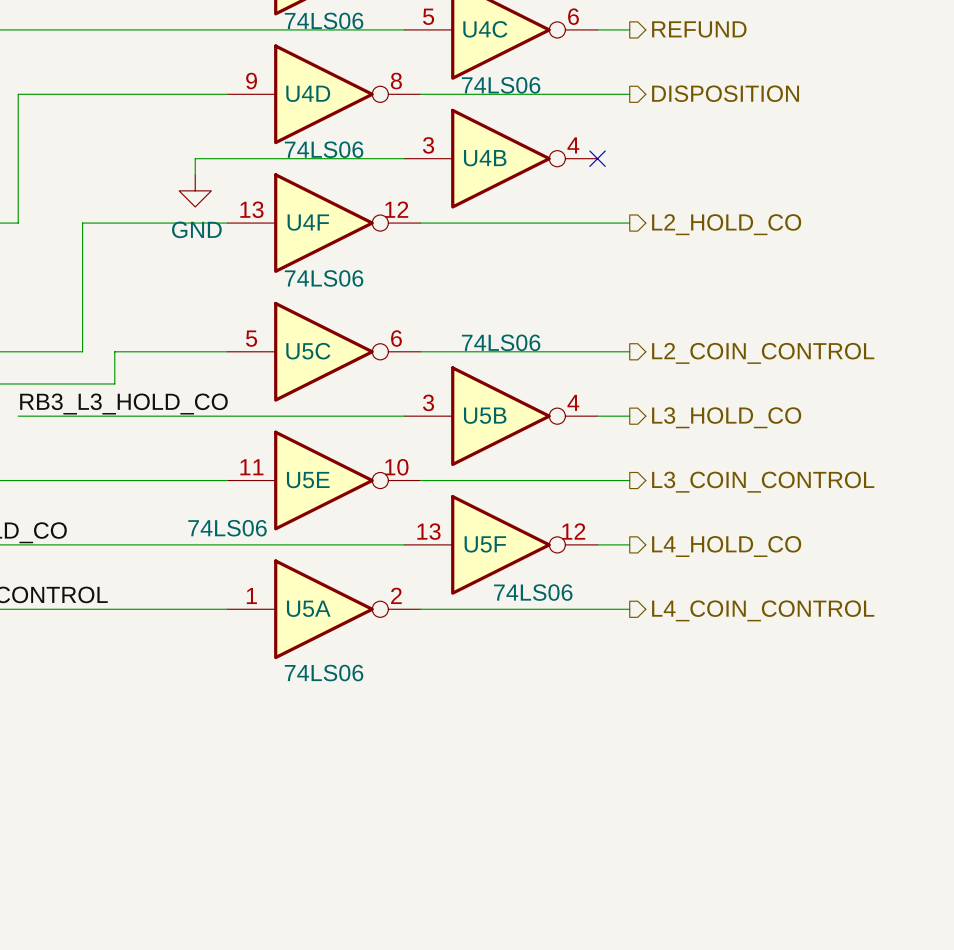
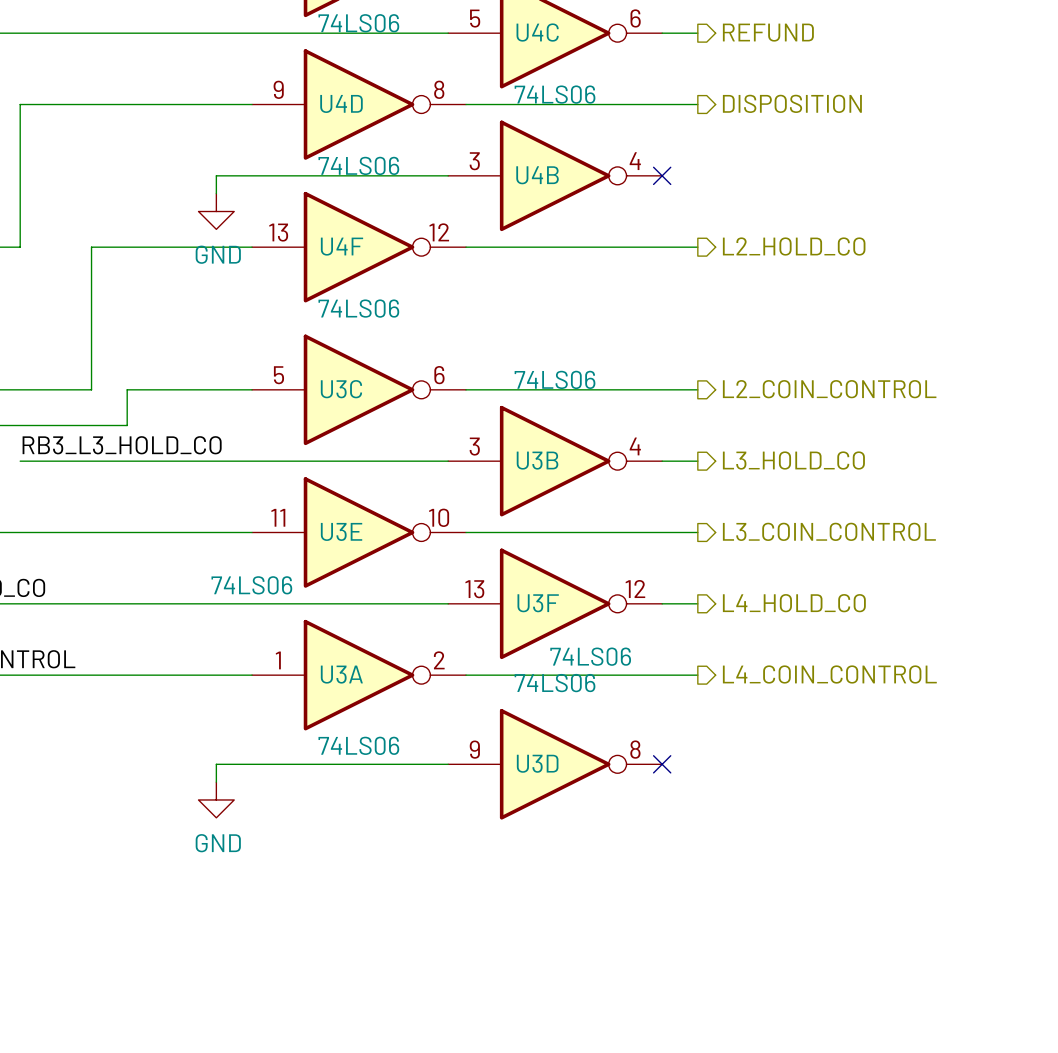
U5C name: U5C (308, 351) -> U3C (341, 389)
U5B name: U5B (485, 415) -> U3B (537, 460)
U5E name: U5E (308, 480) -> U3E (341, 531)
U5F name: U5F (485, 544) -> U3F (538, 603)
U5A name: U5A (308, 608) -> U3A (341, 674)
wire: none -> (448, 764) (216, 764) (216, 782)
U3D: none -> 74LS06 (555, 764)
no-connect mark: none -> (662, 764)
power symbol: none -> GND (216, 799)

